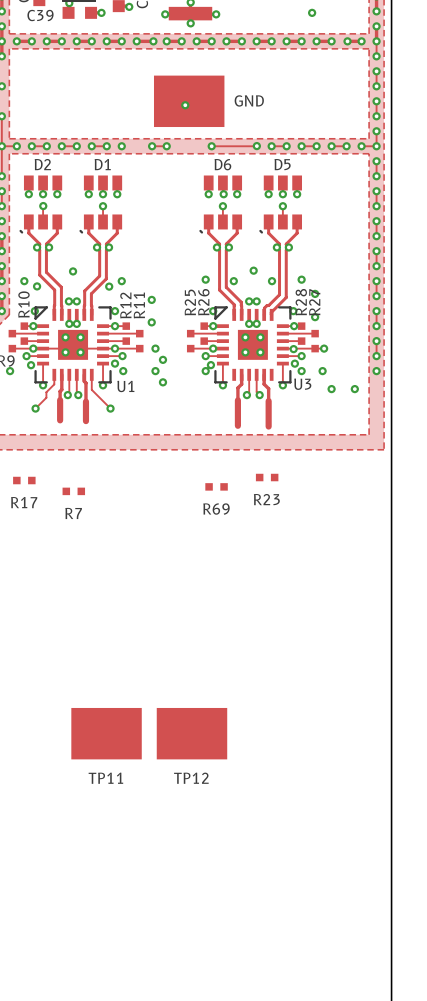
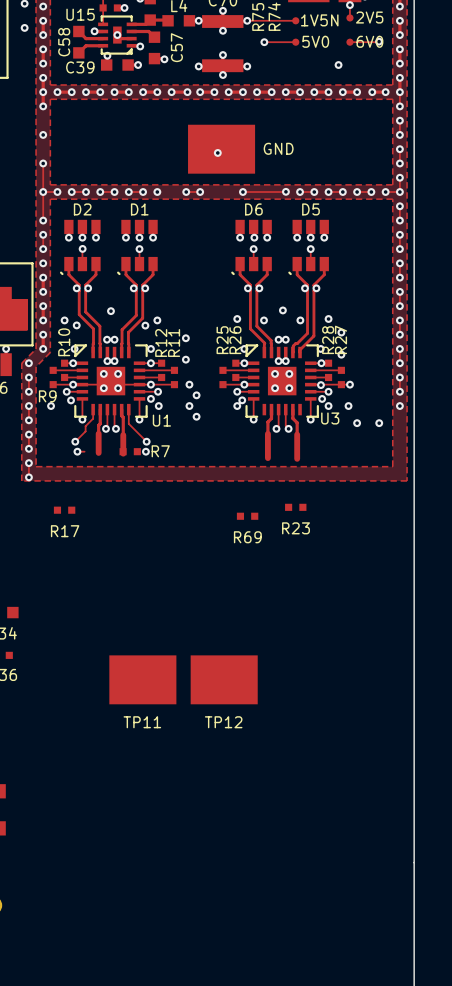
track: none -> (77, 451) (84, 451)
via: none -> (77, 451)
via: none -> (145, 451)
R7 position: (73, 491) -> (130, 451)
R7 name position: R7 (73, 513) -> R7 (160, 451)
TP11 position: (106, 733) -> (142, 679)
TP12 position: (191, 733) -> (224, 679)

